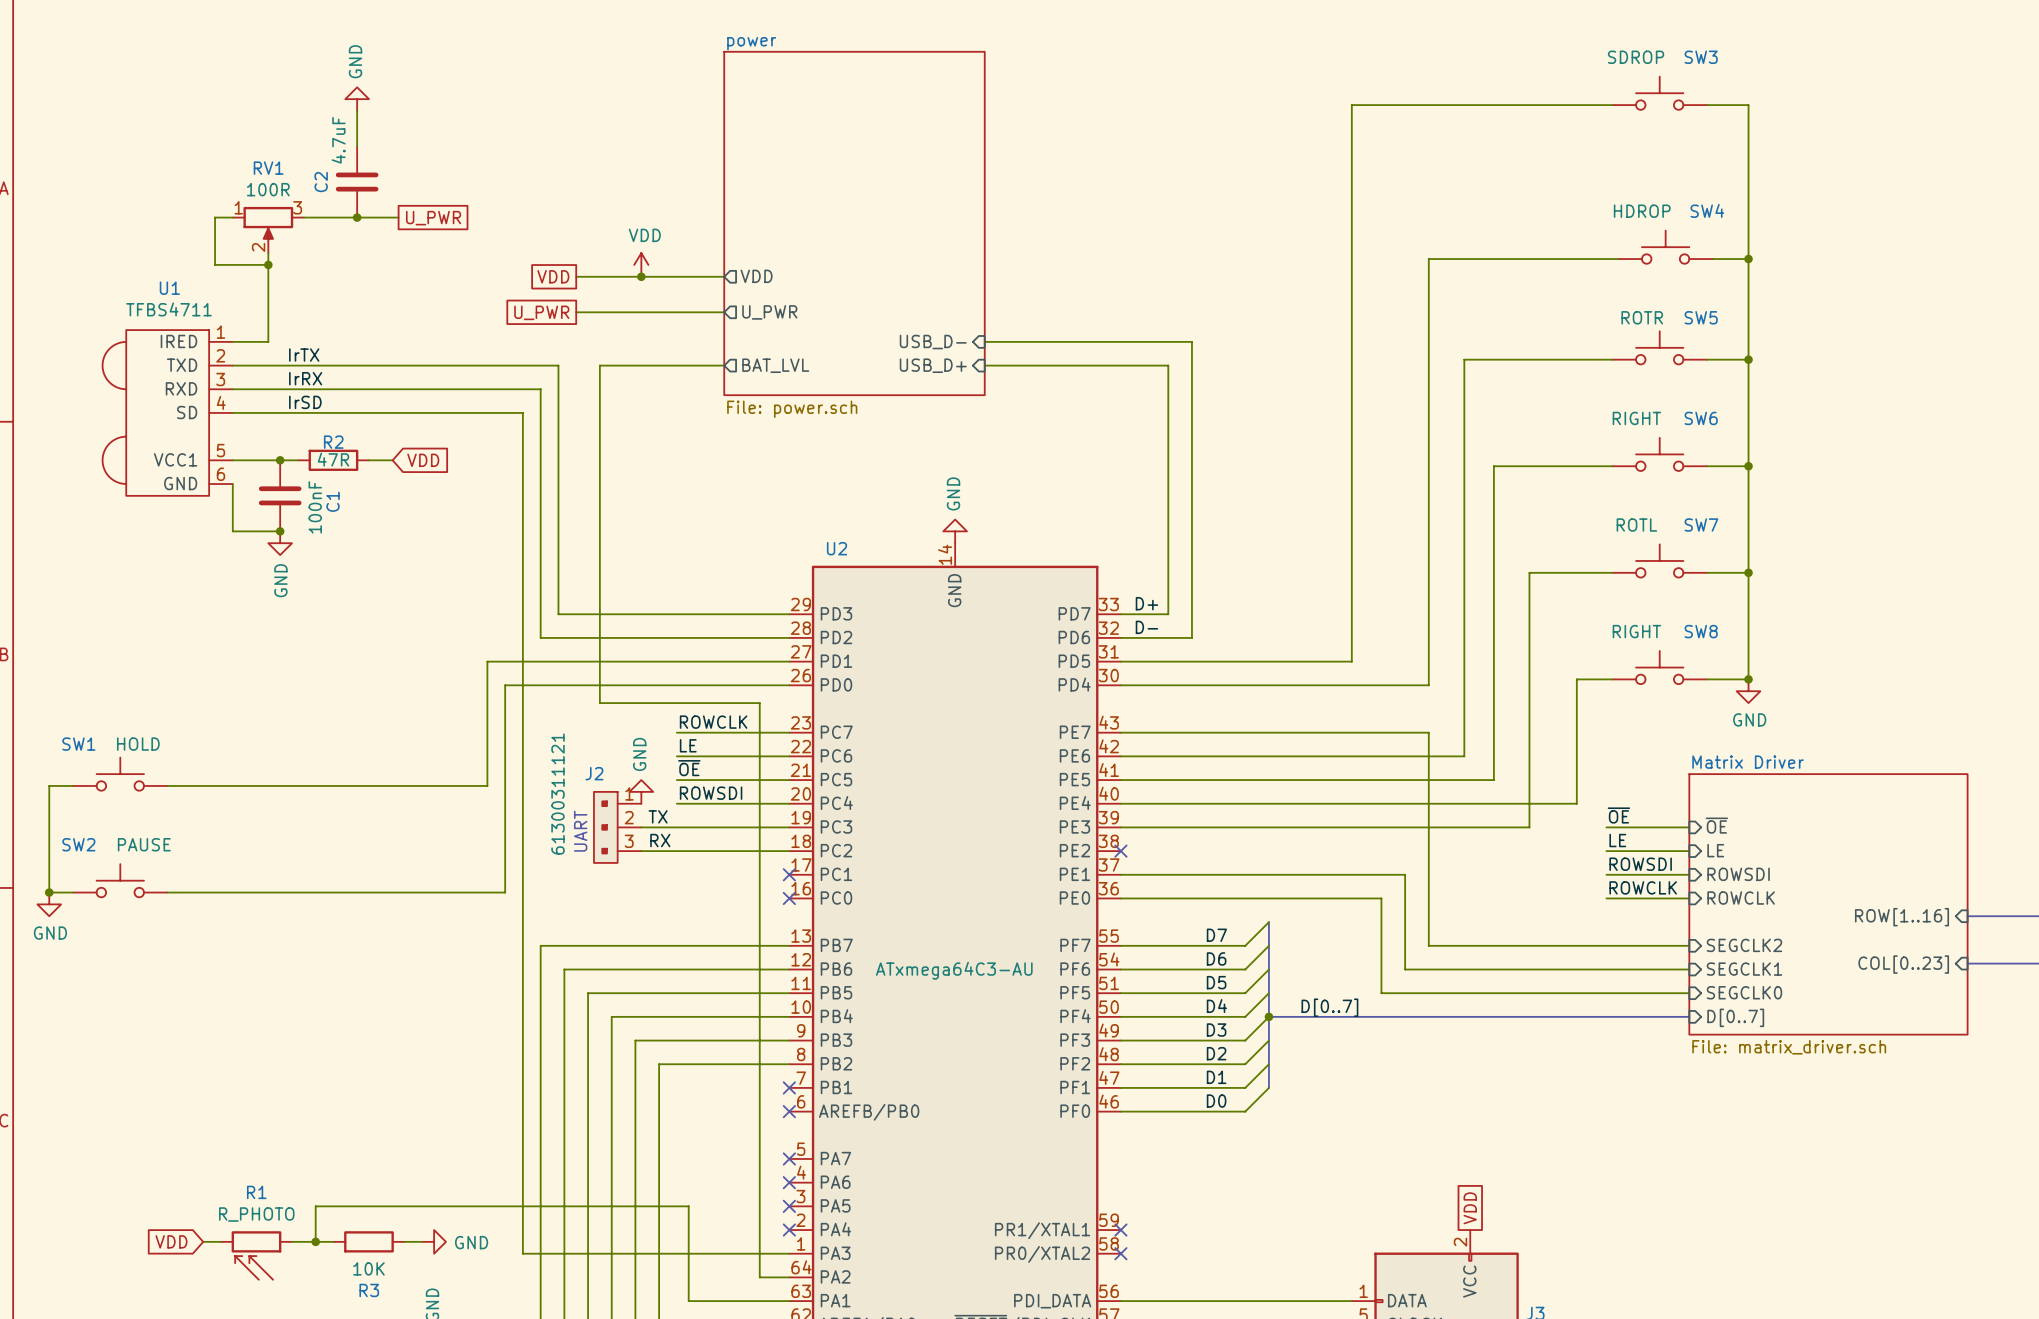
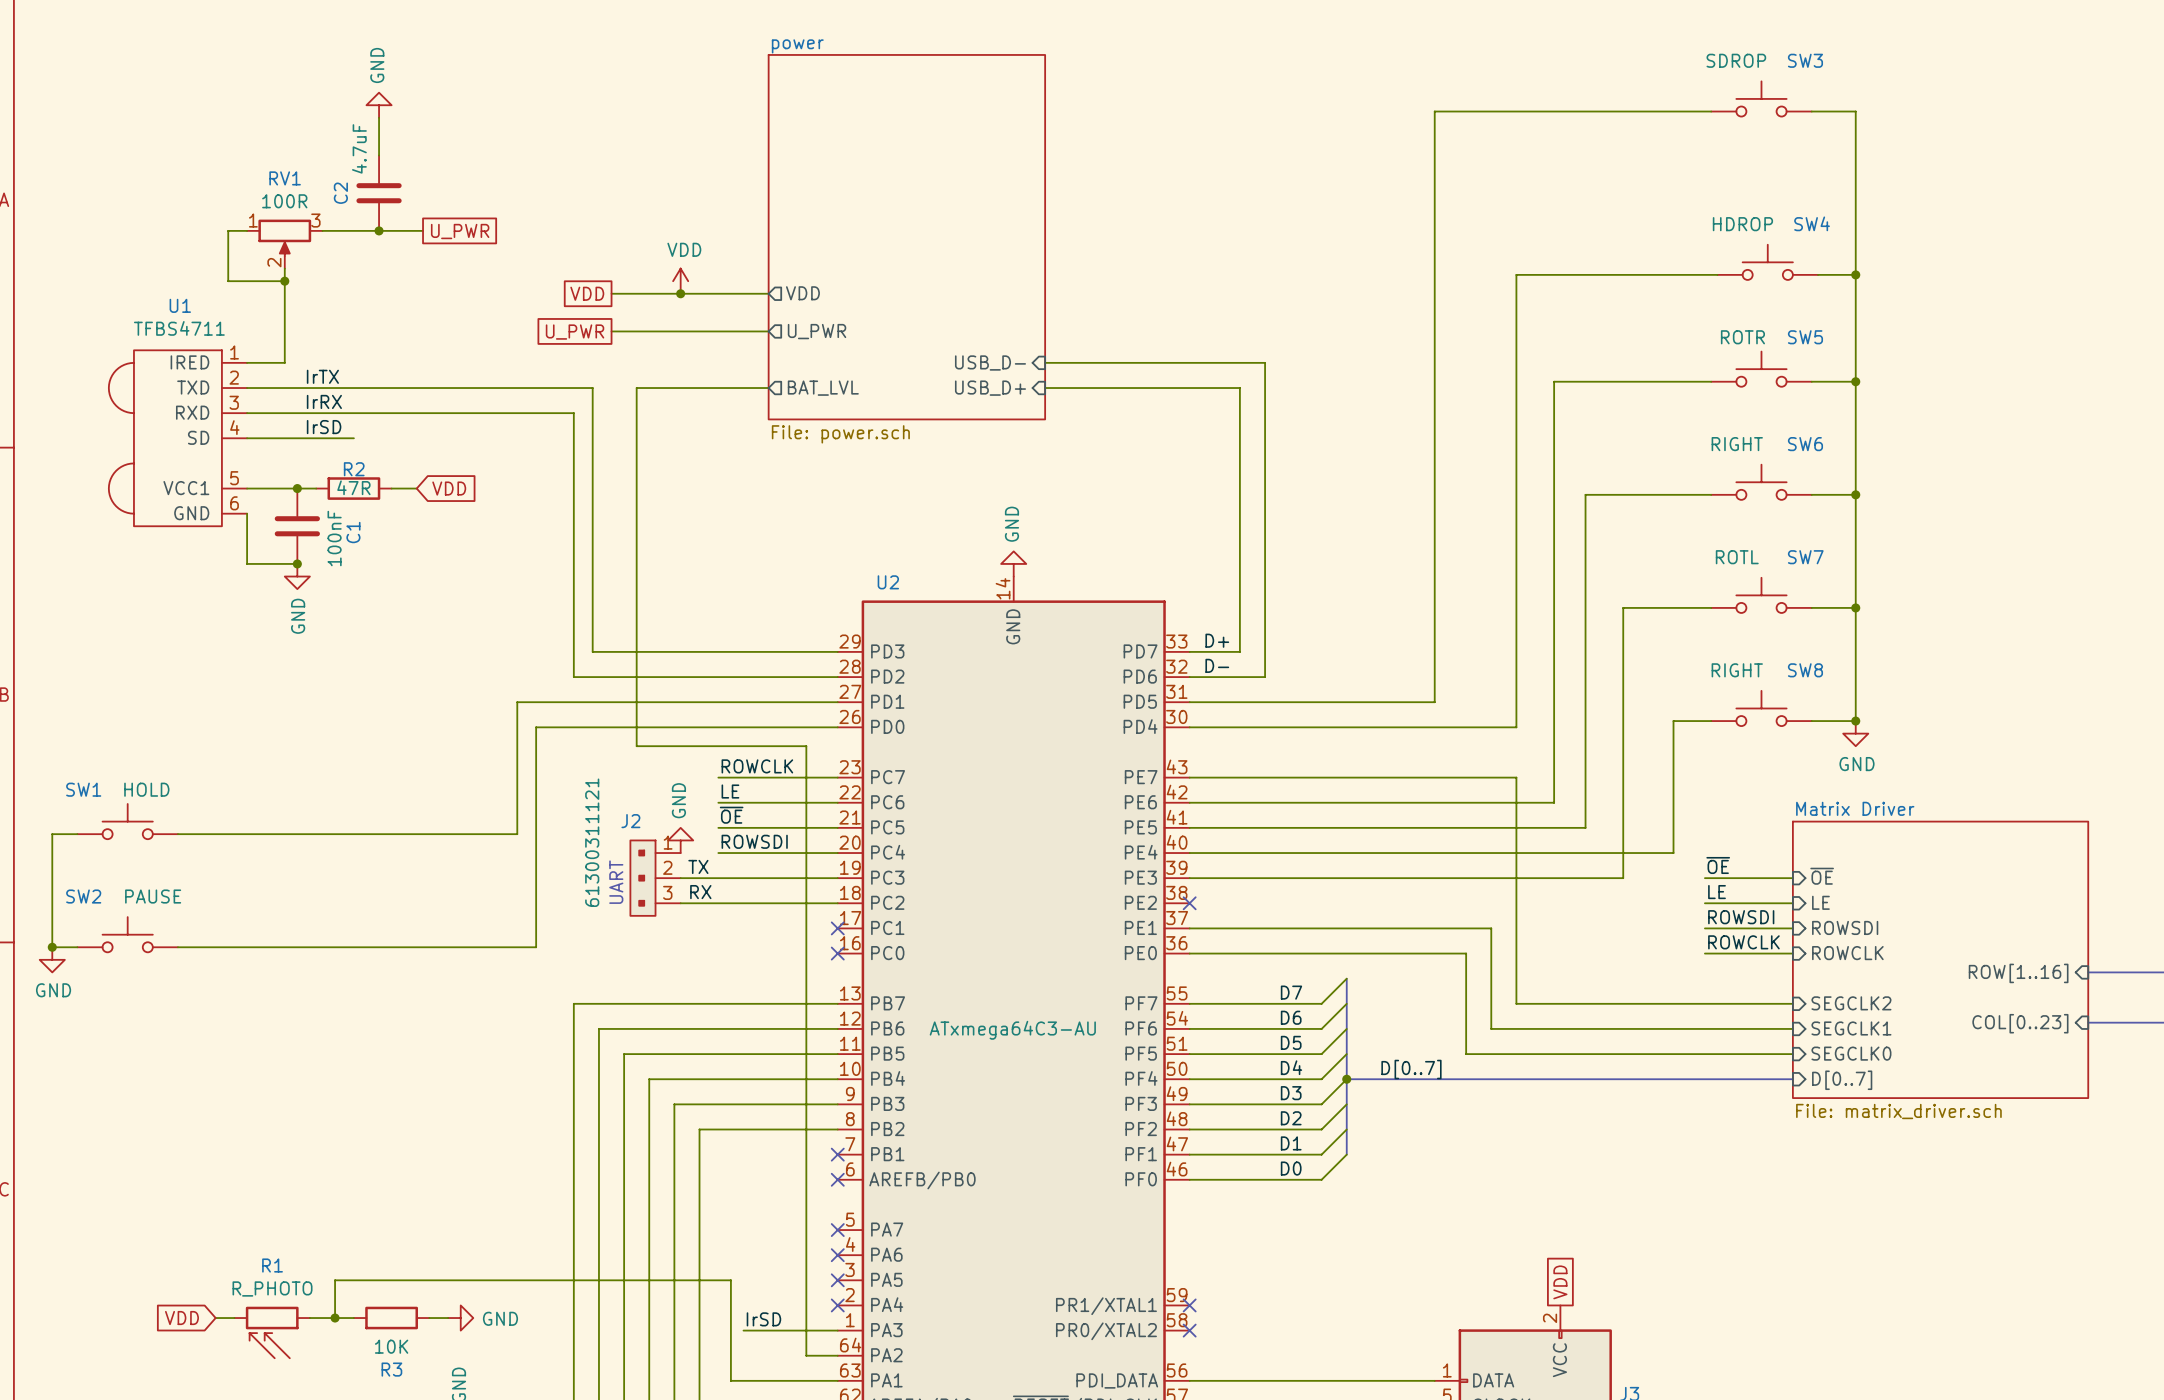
wire: (333, 412) (522, 412) (522, 1253) (700, 1253) -> none
label: none -> IrSD (763, 1319)

